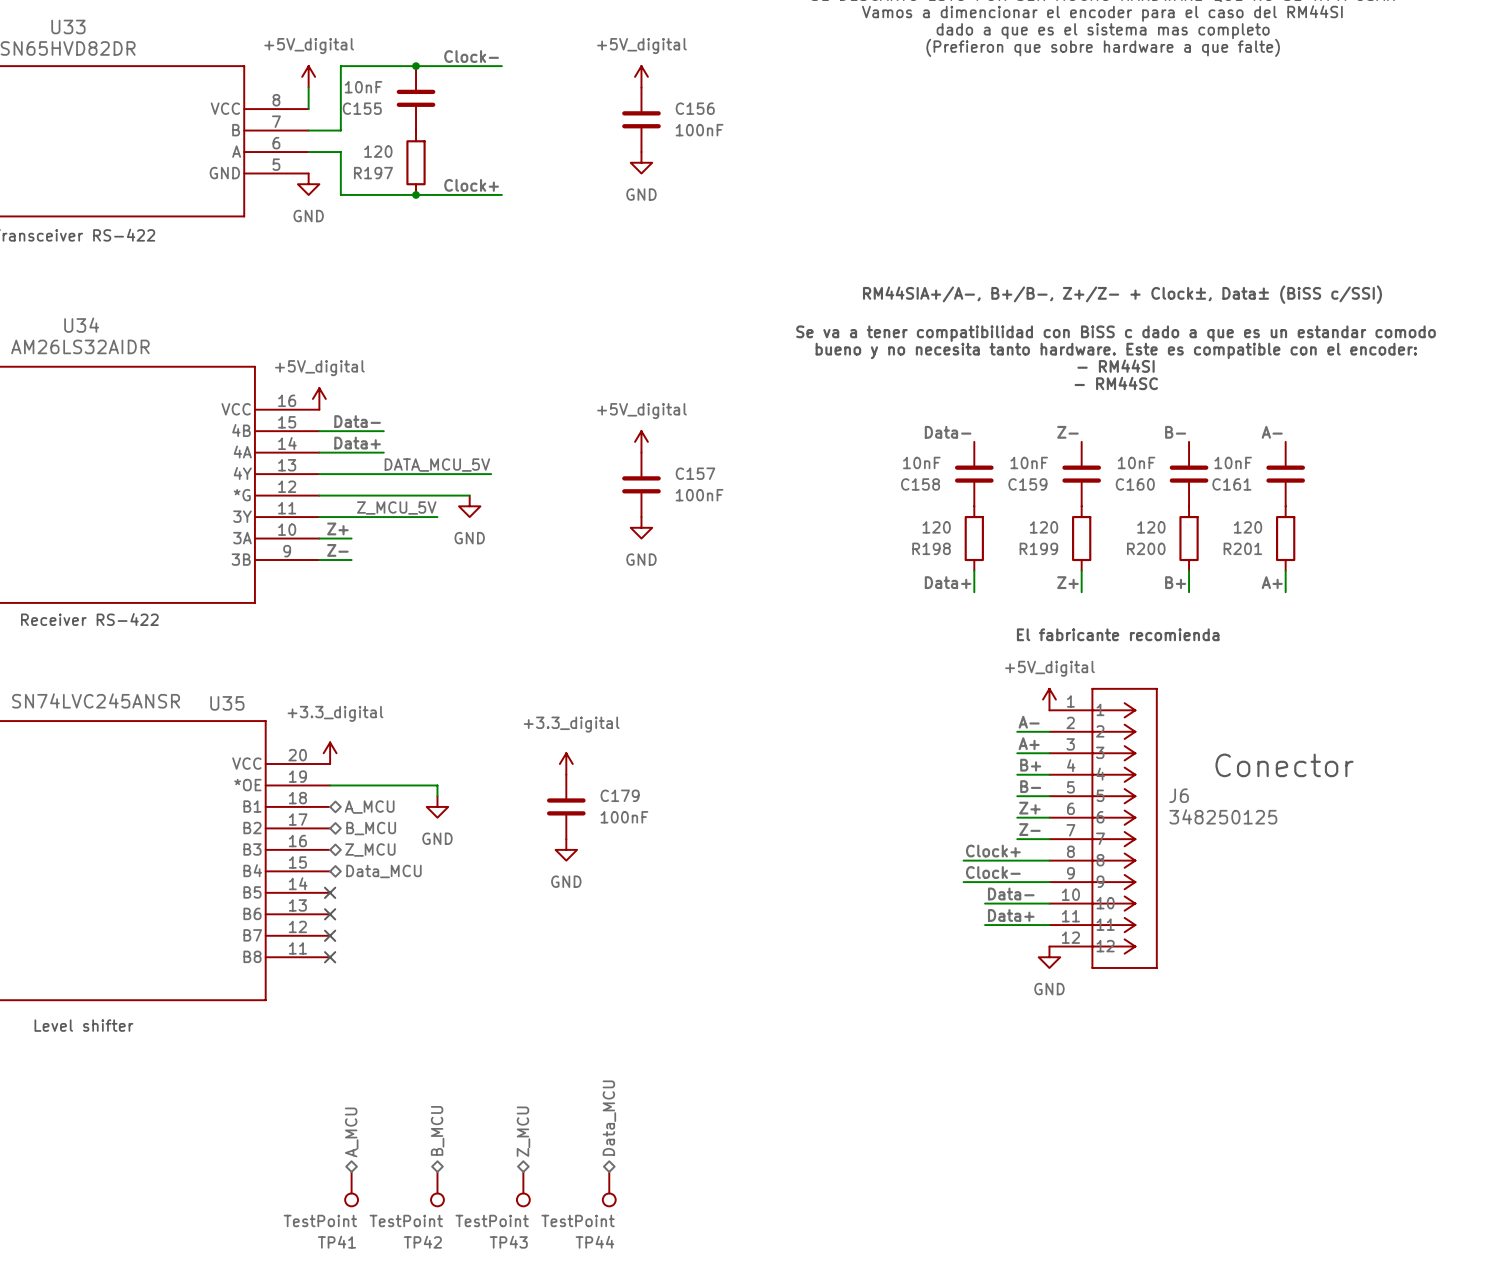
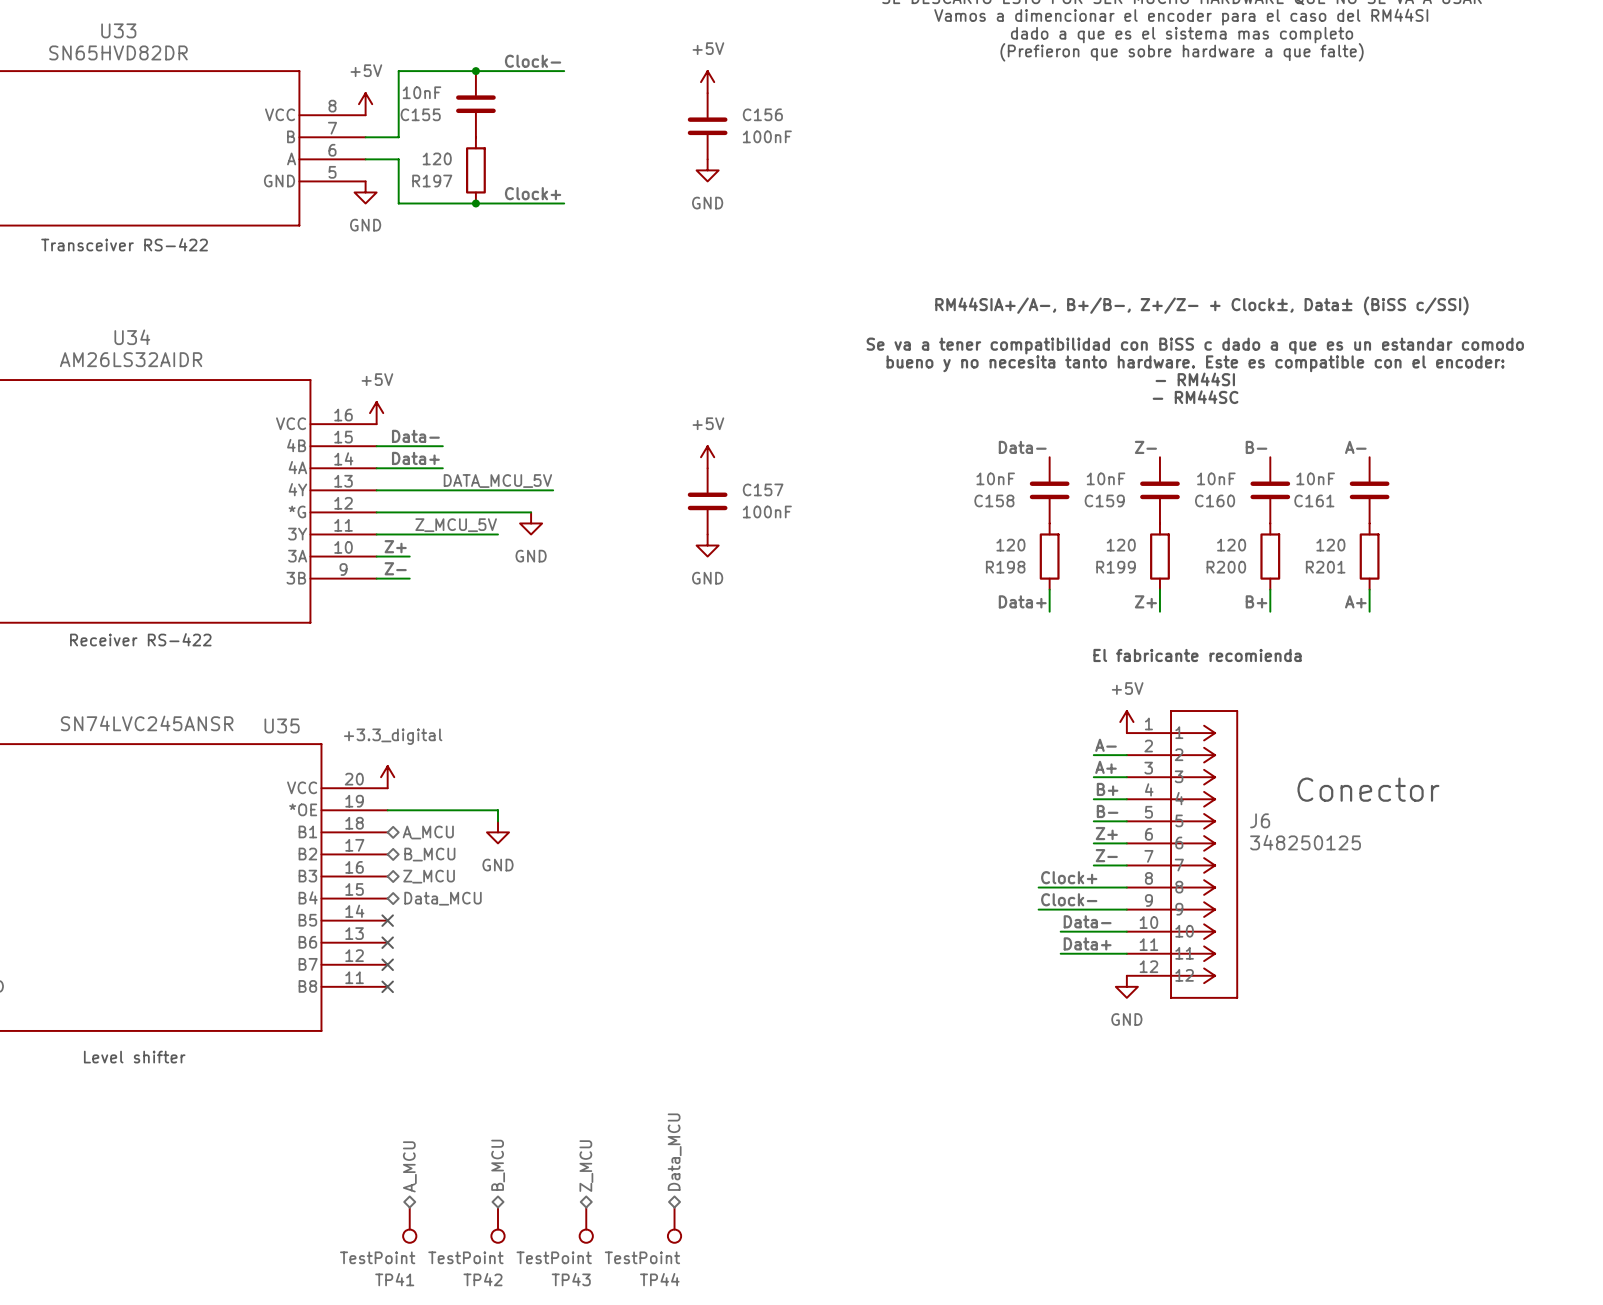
power symbol: +5V_digital (308, 76) -> none
power symbol: +5V_digital (641, 76) -> +5V (707, 82)
power symbol: none -> +5V (365, 104)
power symbol: +5V_digital (319, 398) -> +5V (376, 413)
power symbol: +5V_digital (641, 441) -> +5V (707, 457)
power symbol: +5V_digital (1049, 699) -> +5V (1126, 722)
power symbol: +3.3_digital (566, 764) -> none
C179: 100nF (566, 806) -> none
power symbol: GND (566, 849) -> none

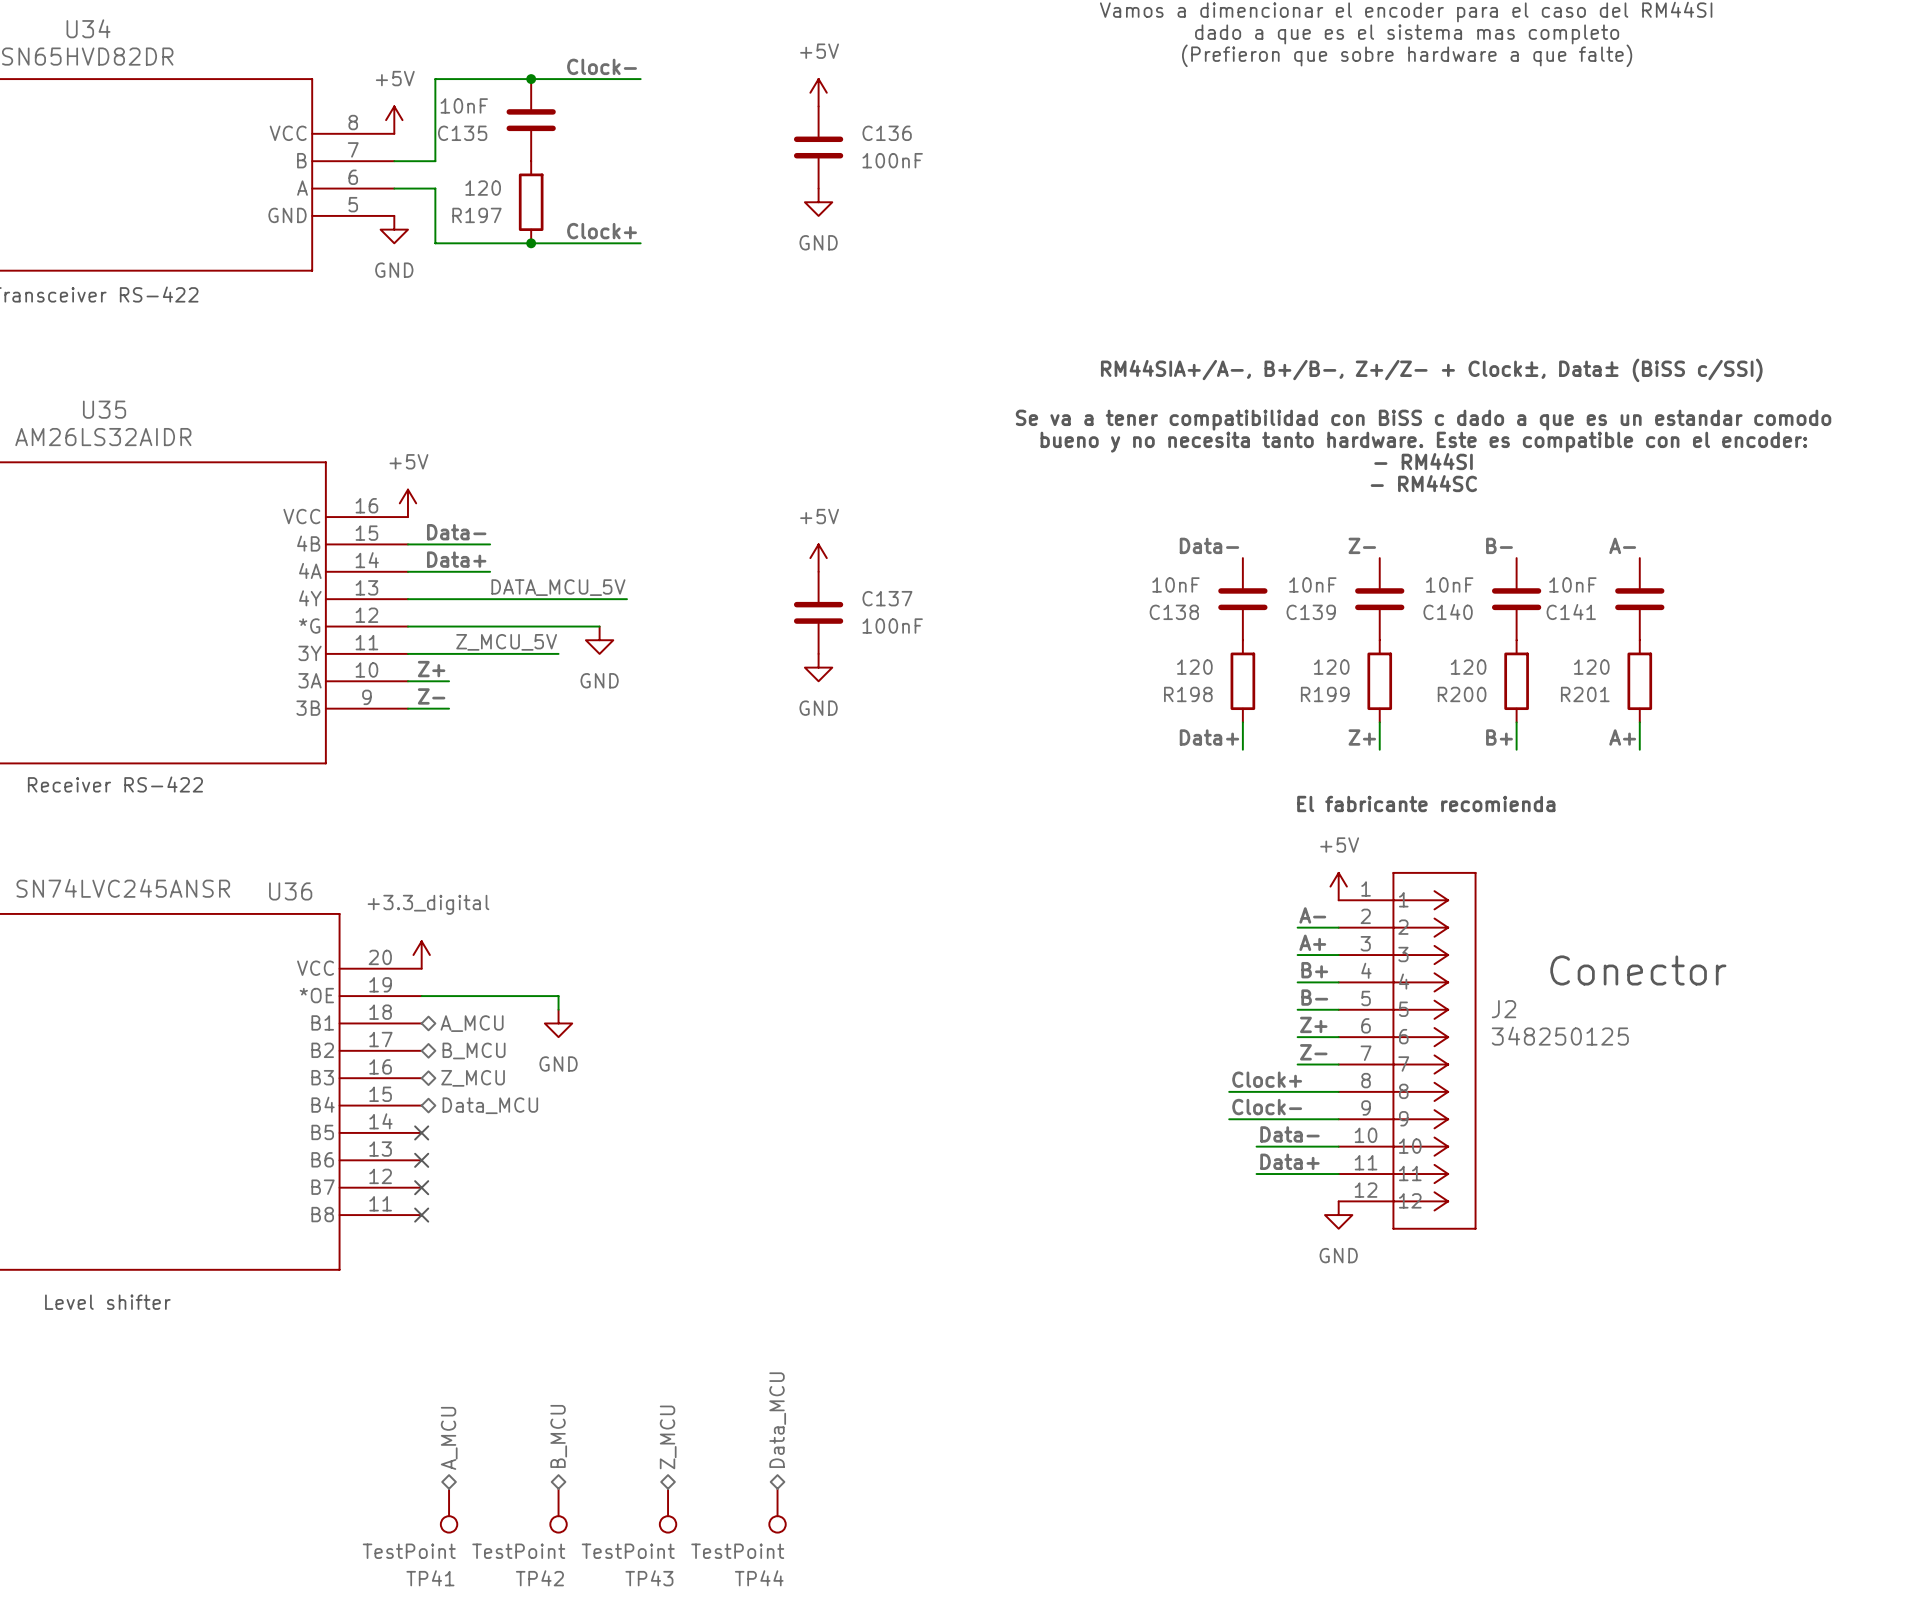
U33 name: U33 (118, 30) -> U34 (88, 28)
C155 name: C155 (420, 114) -> C135 (462, 133)
C156 name: C156 (762, 114) -> C136 (887, 133)
U34 name: U34 (132, 337) -> U35 (104, 409)
C157 name: C157 (763, 489) -> C137 (887, 598)
C158 name: C158 (994, 500) -> C138 (1174, 612)
C159 name: C159 (1104, 500) -> C139 (1311, 612)
C160 name: C160 (1215, 500) -> C140 (1448, 612)
C161 name: C161 (1314, 500) -> C141 (1571, 612)
U35 name: U35 (282, 725) -> U36 (290, 891)
J6 name: J6 (1260, 820) -> J2 (1504, 1009)

